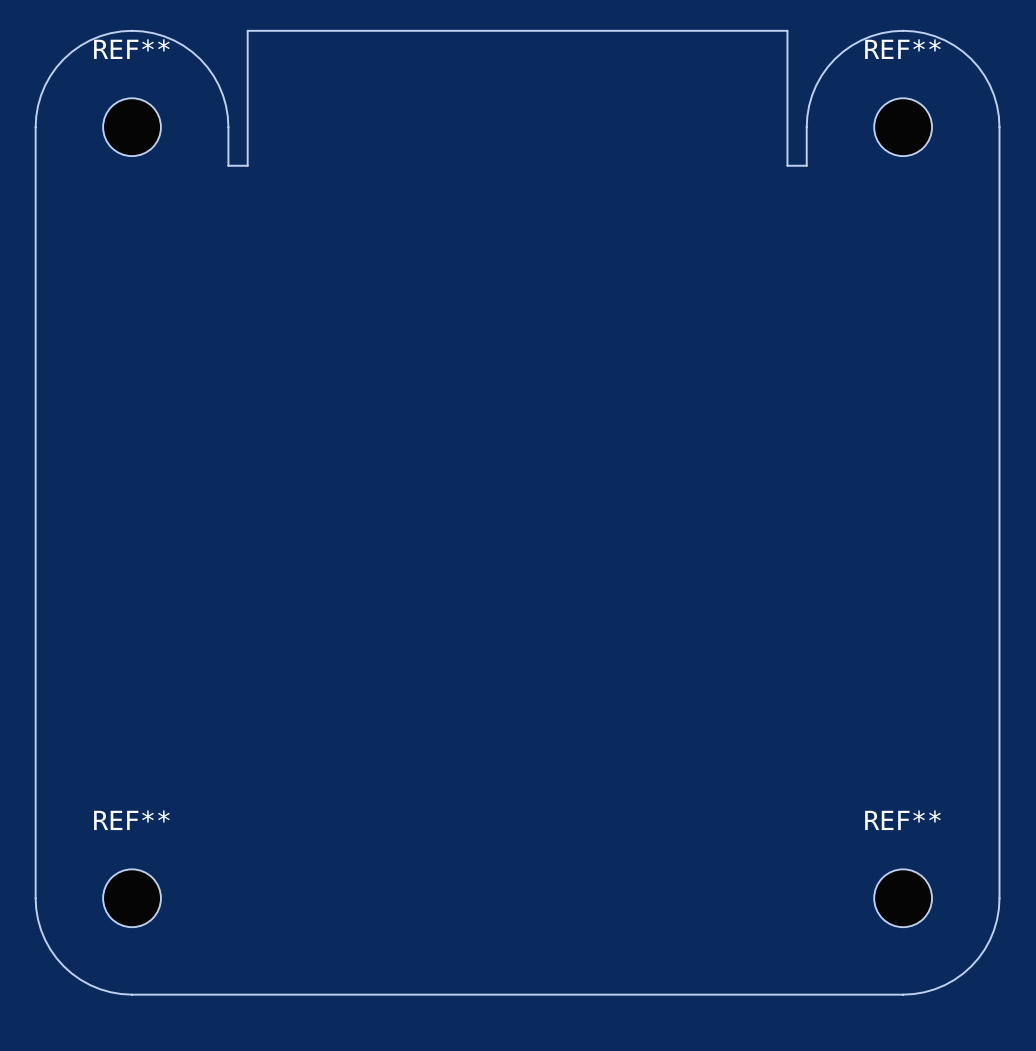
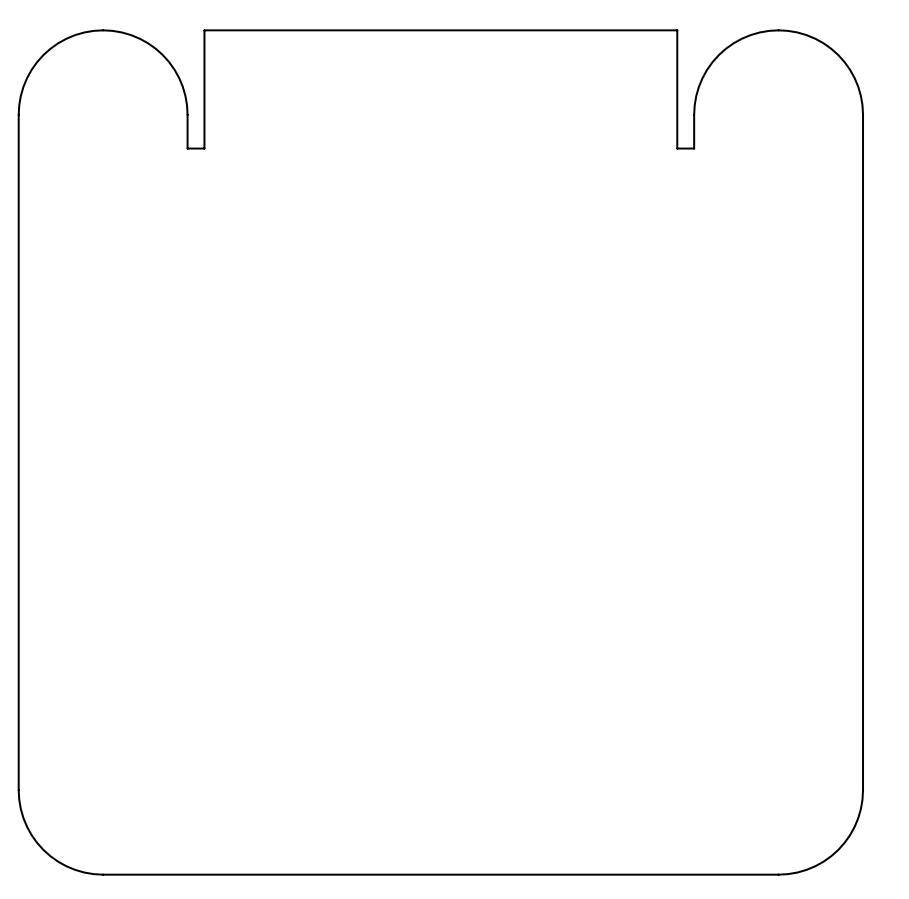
REF**: (132, 127) -> none
REF**: (903, 127) -> none
REF**: (132, 898) -> none
REF**: (903, 898) -> none

